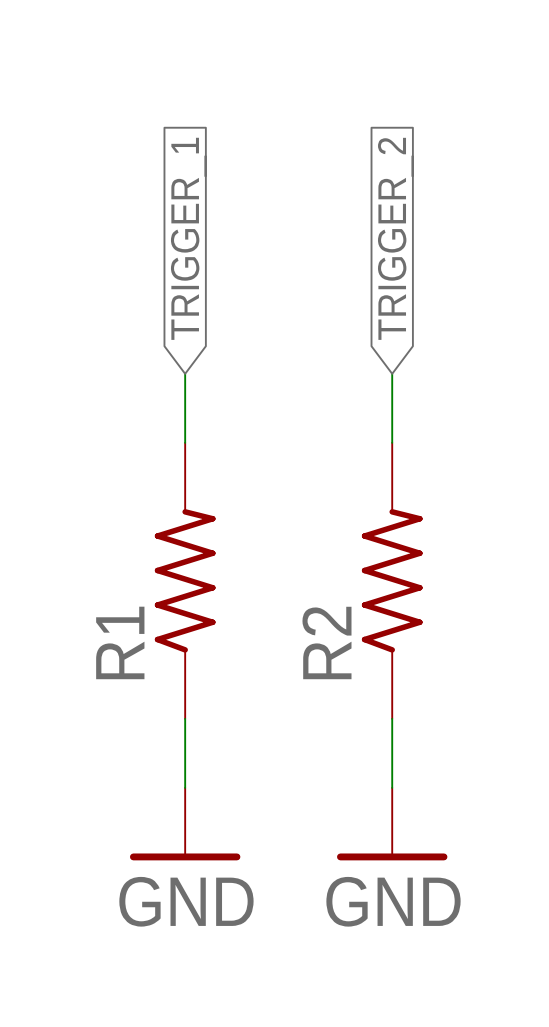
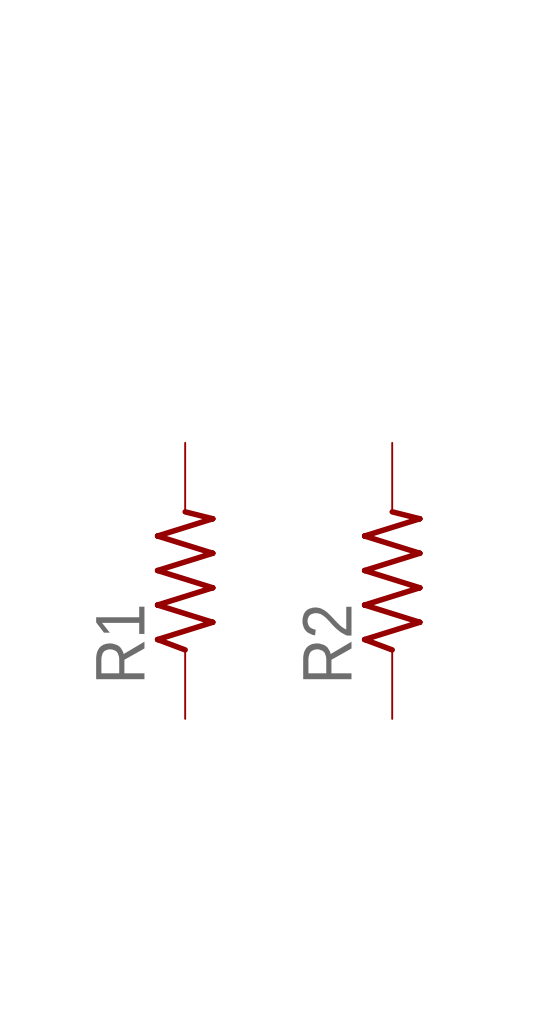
global label: TRIGGER_1 (188, 238) -> none
global label: TRIGGER_2 (395, 238) -> none
wire: (185, 373) (185, 442) -> none
wire: (392, 373) (392, 442) -> none
wire: (185, 718) (185, 787) -> none
wire: (392, 718) (392, 787) -> none
power symbol: GND (185, 824) -> none
power symbol: GND (392, 824) -> none

